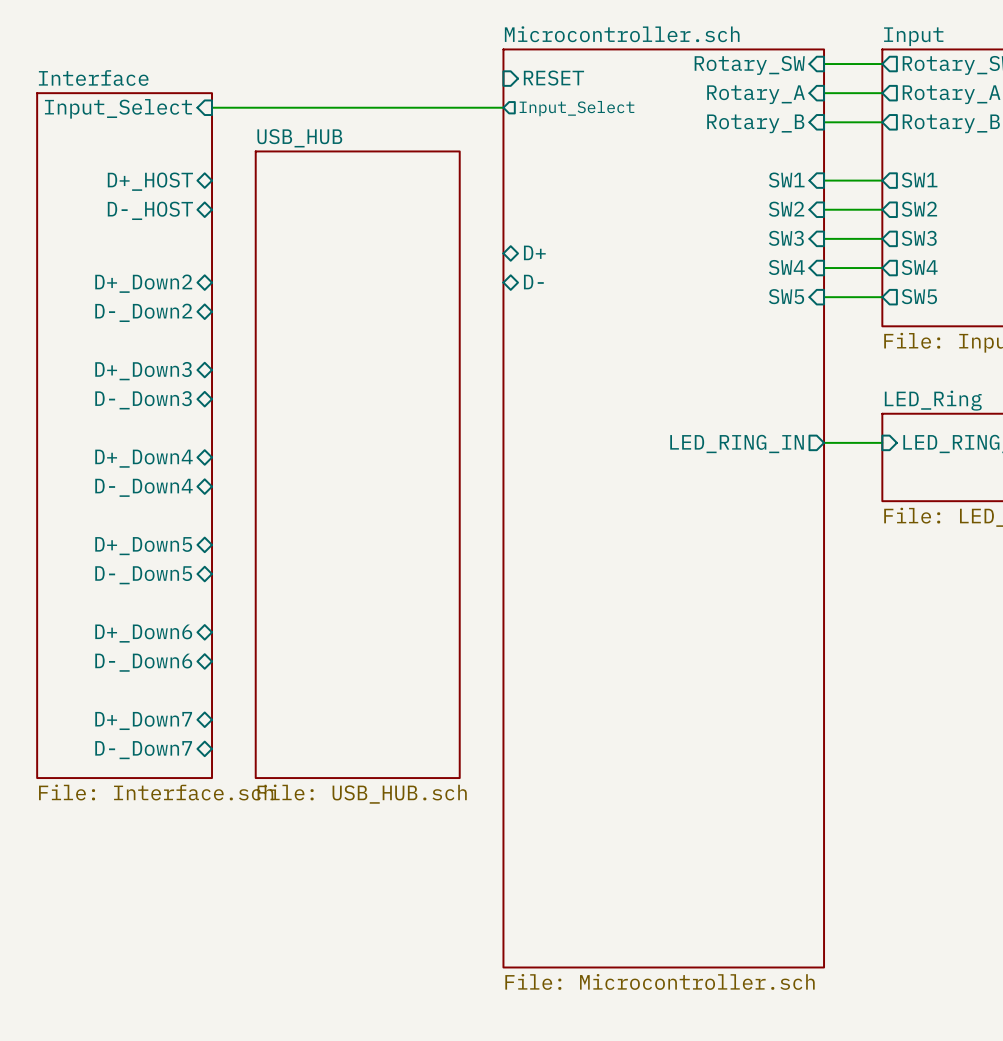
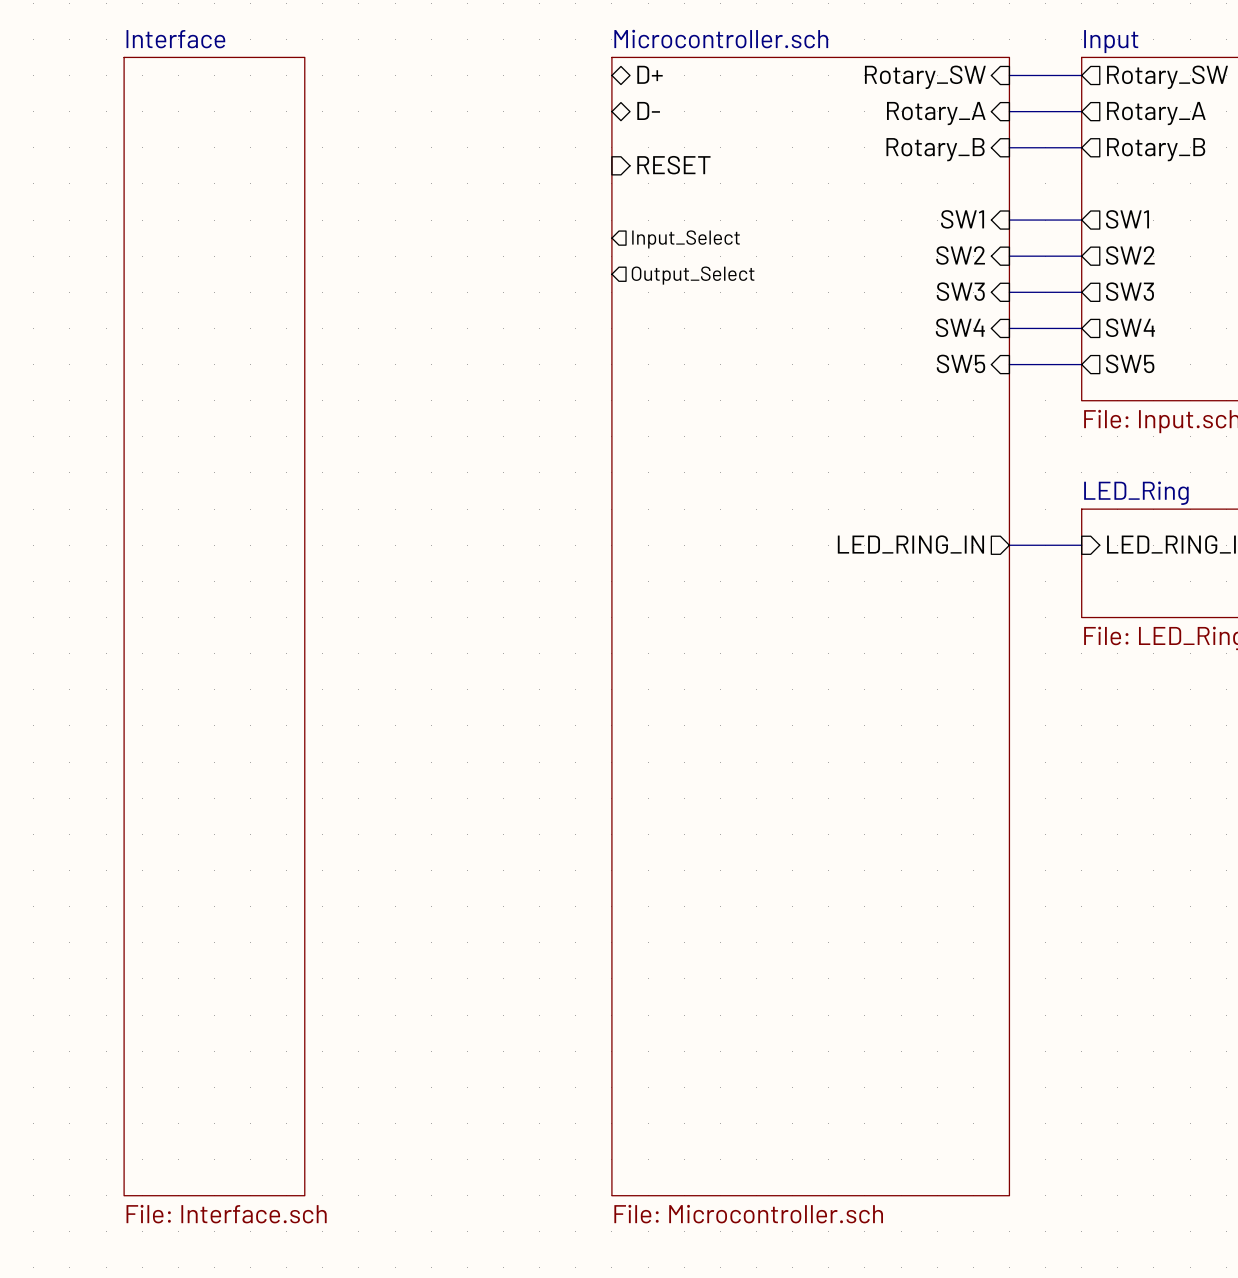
sheet pin position: RESET (553, 78) -> RESET (673, 165)
wire: (212, 107) (503, 107) -> none
sheet pin: Input_Select (118, 108) -> none
sheet pin position: Input_Select (576, 108) -> Input_Select (686, 239)
sheet pin: D+_HOST (150, 181) -> none
sheet pin: D-_HOST (150, 210) -> none
sheet pin: none -> Output_Select (693, 275)
sheet pin position: D+ (534, 252) -> D+ (650, 74)
sheet pin position: D- (533, 282) -> D- (648, 110)
sheet pin: D+_Down2 (143, 283) -> none
sheet pin: D-_Down2 (143, 312) -> none
sheet pin: D+_Down3 (143, 371) -> none
sheet pin: D-_Down3 (143, 400) -> none
sheet Interface: File: Interface.sch (124, 435) -> none
sheet pin: D+_Down4 (143, 458) -> none
sheet USB_HUB: File: USB_HUB.sch (357, 464) -> none
sheet pin: D-_Down4 (143, 487) -> none
sheet Interface: none -> File: Interface.sch (214, 626)
sheet pin: D+_Down5 (143, 546) -> none
sheet pin: D-_Down5 (143, 575) -> none
sheet pin: D+_Down6 (143, 633) -> none
sheet pin: D-_Down6 (143, 662) -> none
sheet pin: D+_Down7 (143, 720) -> none
sheet pin: D-_Down7 (143, 750) -> none

